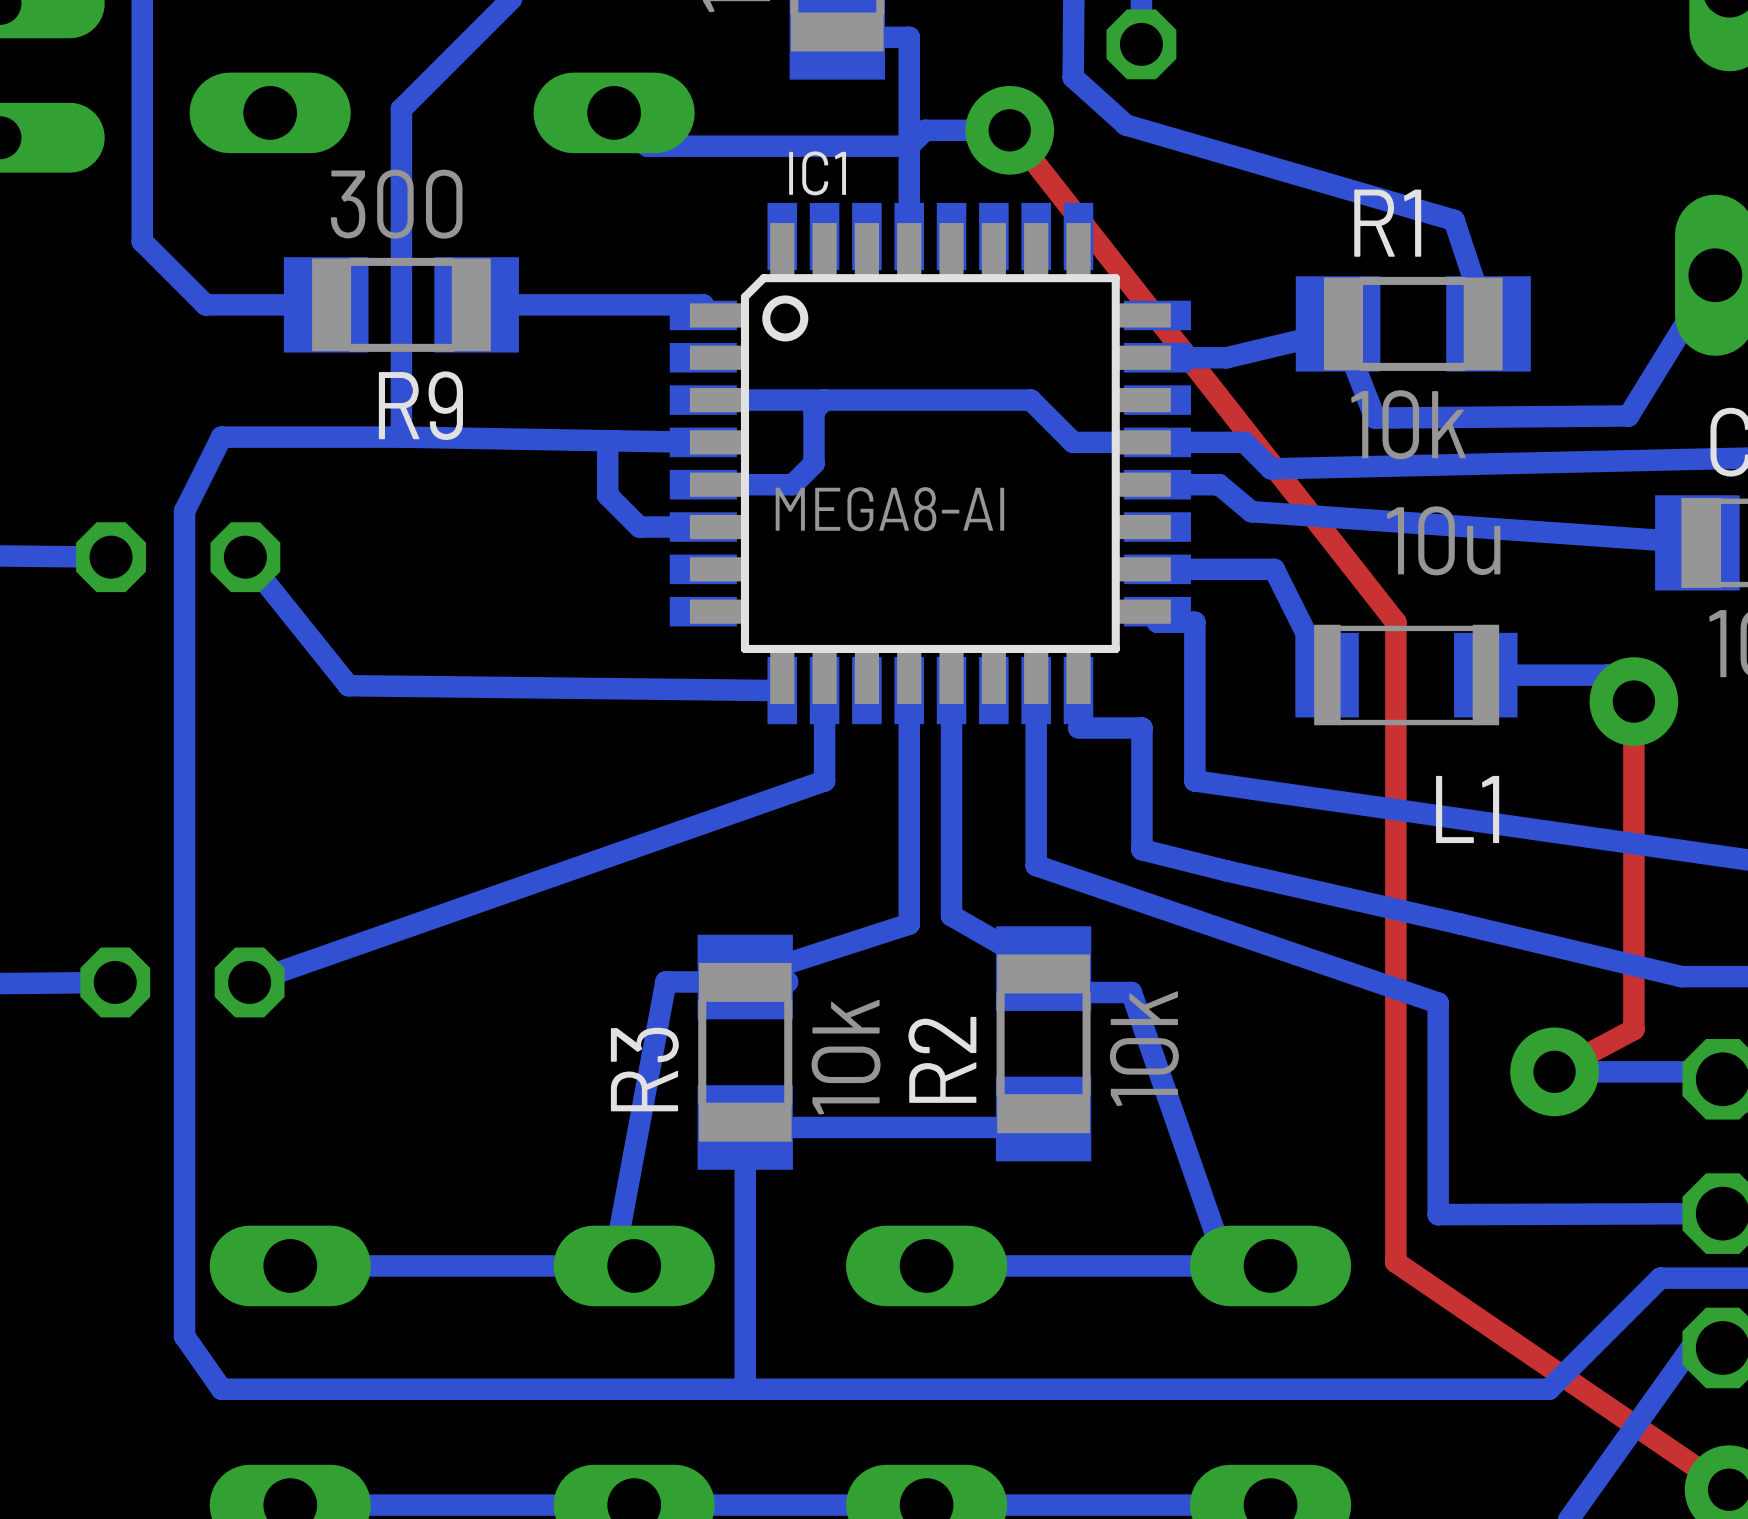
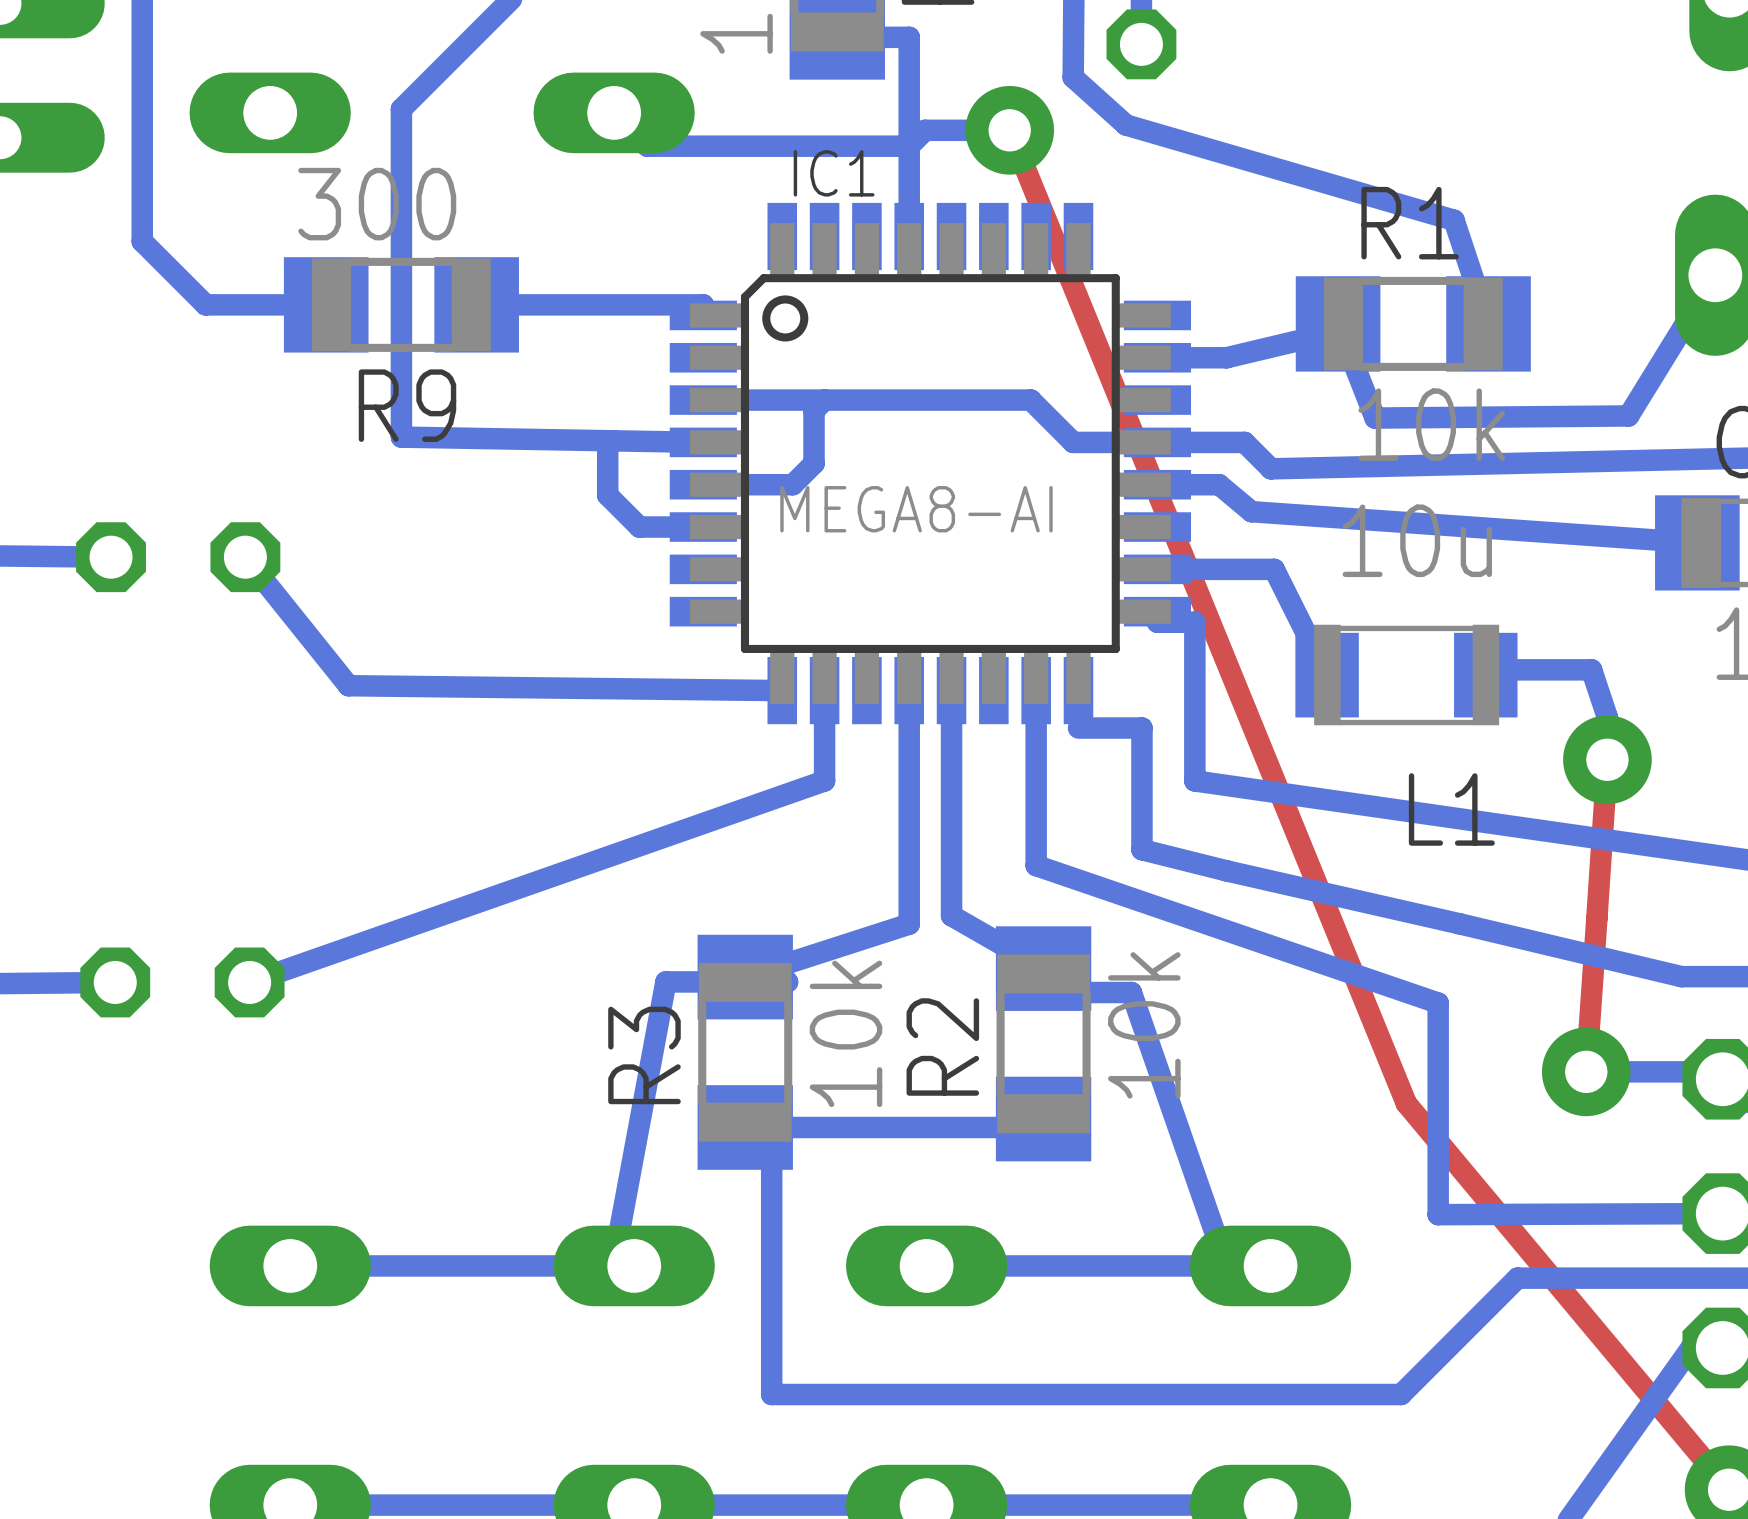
top track: (1009, 130) (1395, 622) (1395, 1262) (1729, 1489) -> (1009, 130) (1406, 1103) (1729, 1489)
bottom track: (401, 437) (221, 437) (184, 511) (184, 1336) (221, 1389) (1549, 1389) (1660, 1278) -> (745, 1127) (771, 1153) (771, 1394) (1401, 1394) (1517, 1278) (1660, 1278)
bottom track: (1485, 675) (1607, 675) (1633, 701) -> (1485, 675) (1491, 669) (1591, 669) (1607, 717) (1607, 759)
top track: (1633, 701) (1633, 1029) (1554, 1071) -> none
via position: (1633, 701) -> (1607, 759)
top track: none -> (1607, 759) (1586, 1071)
via position: (1554, 1071) -> (1586, 1071)
bottom track: (745, 1127) (745, 1383) (739, 1389) -> none

